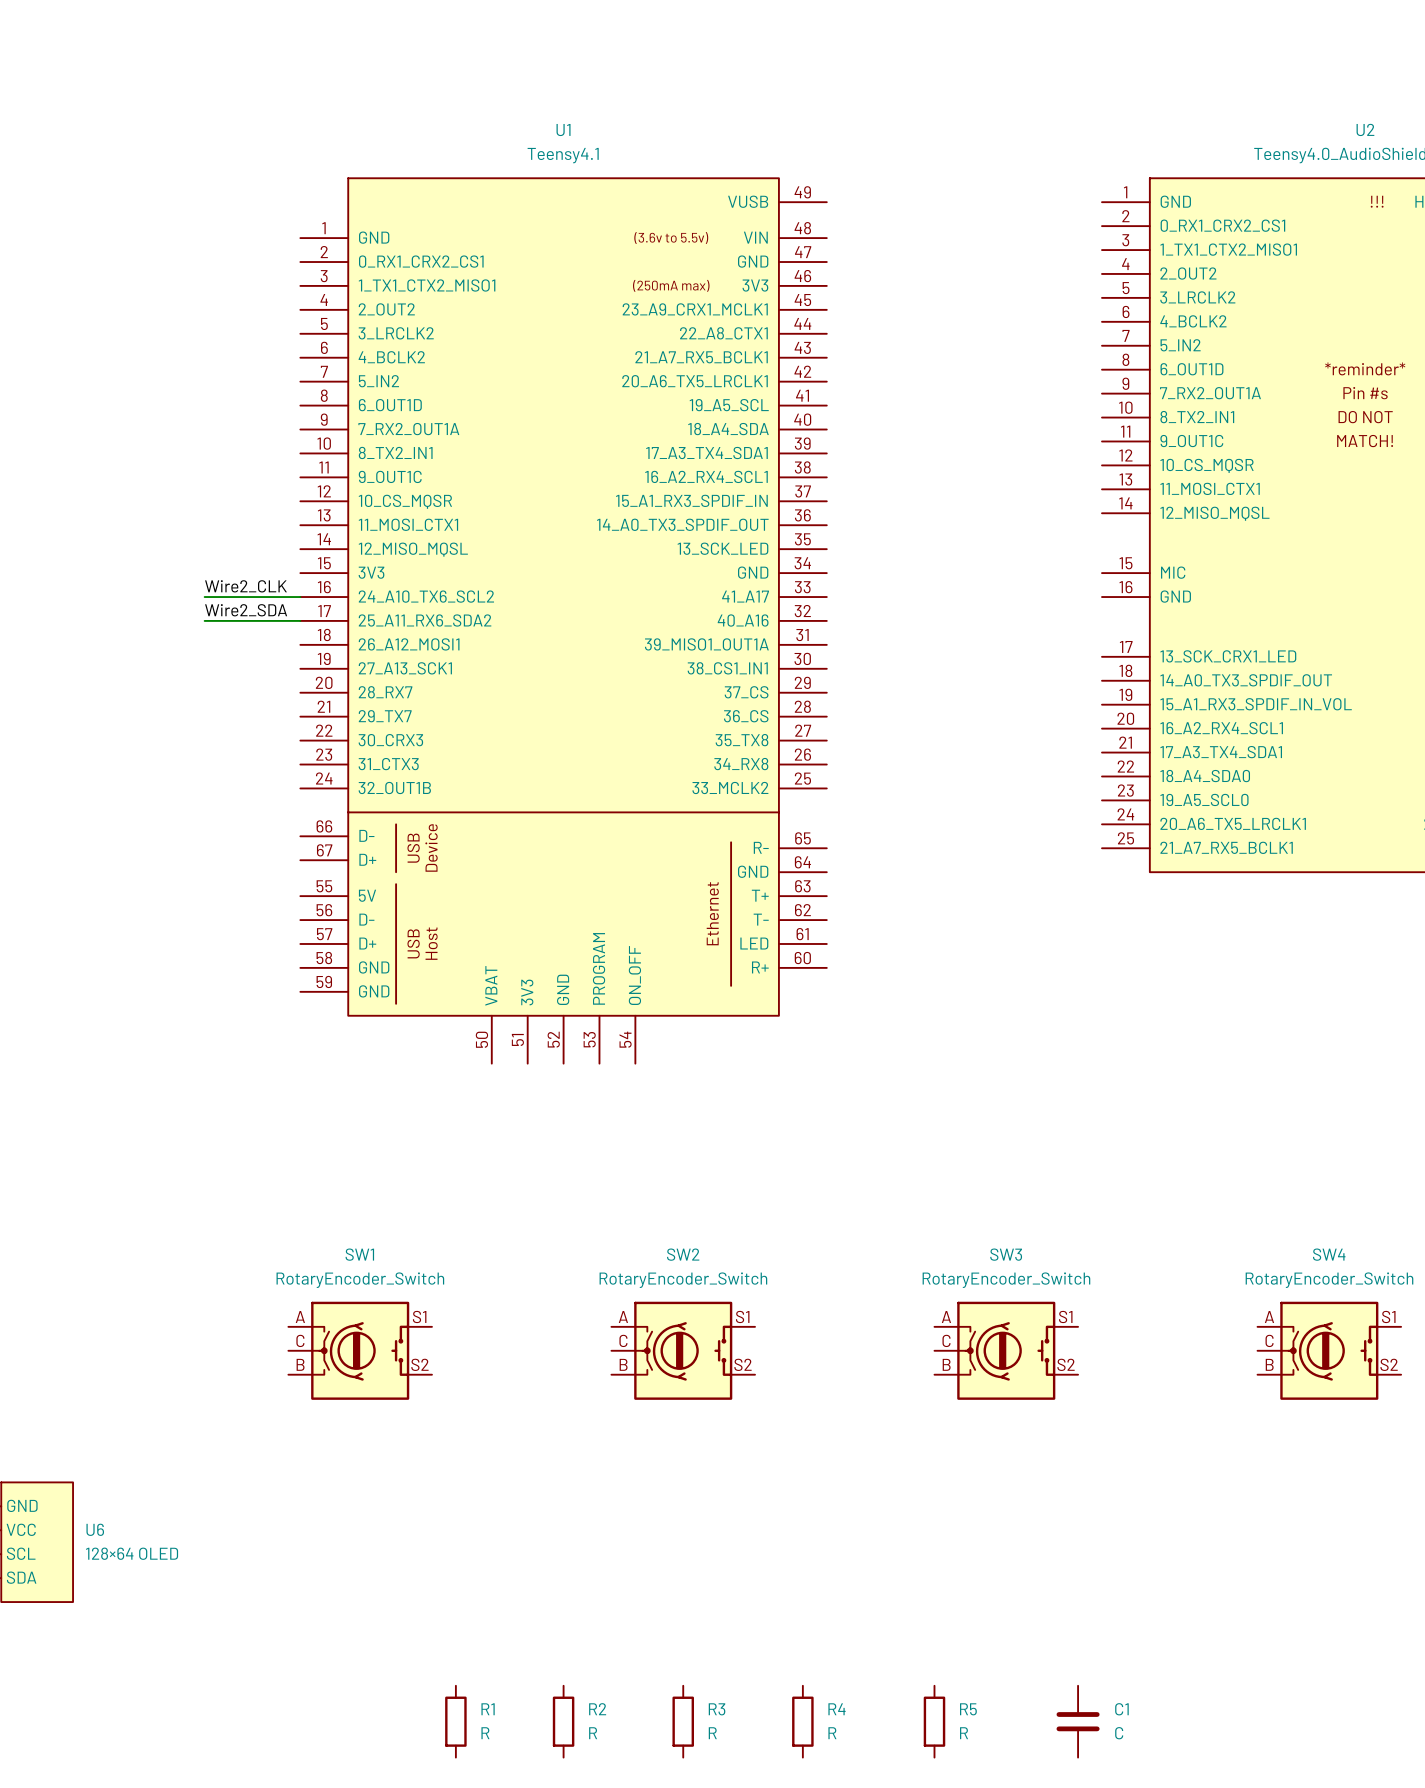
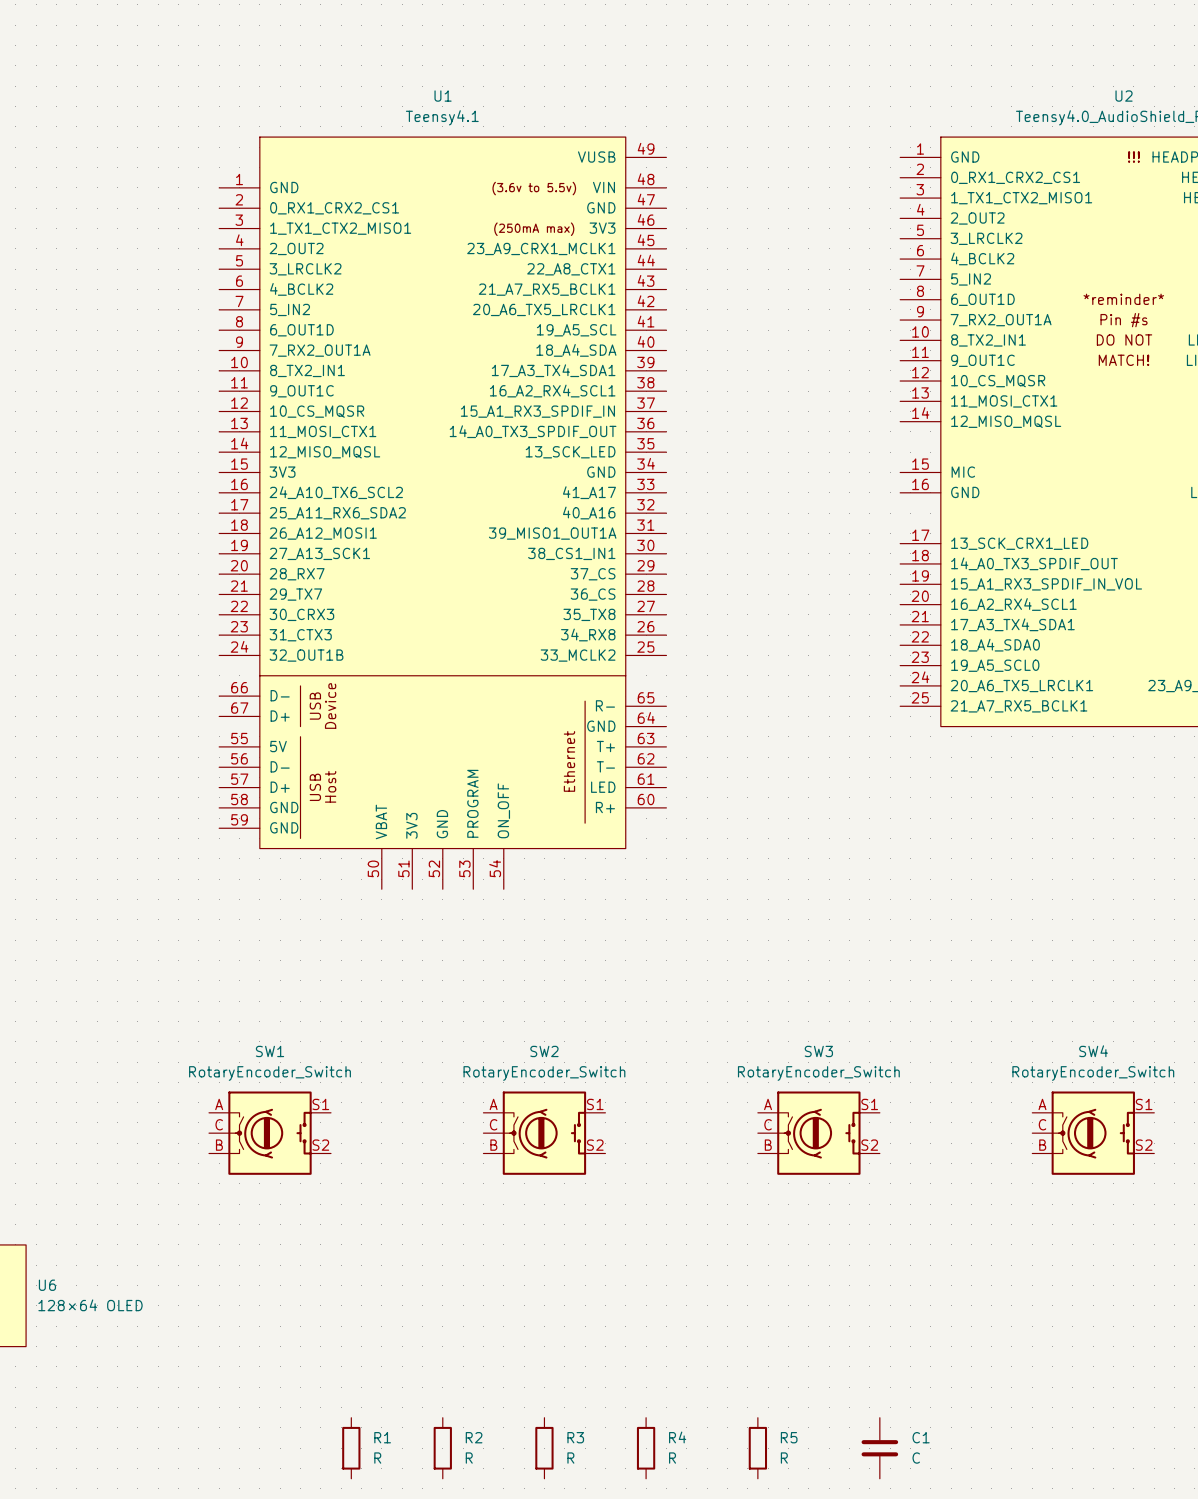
label: Wire2_CLK (245, 586) -> none
wire: (204, 597) (300, 597) -> none
label: Wire2_SDA (246, 610) -> none
wire: (204, 620) (300, 620) -> none

